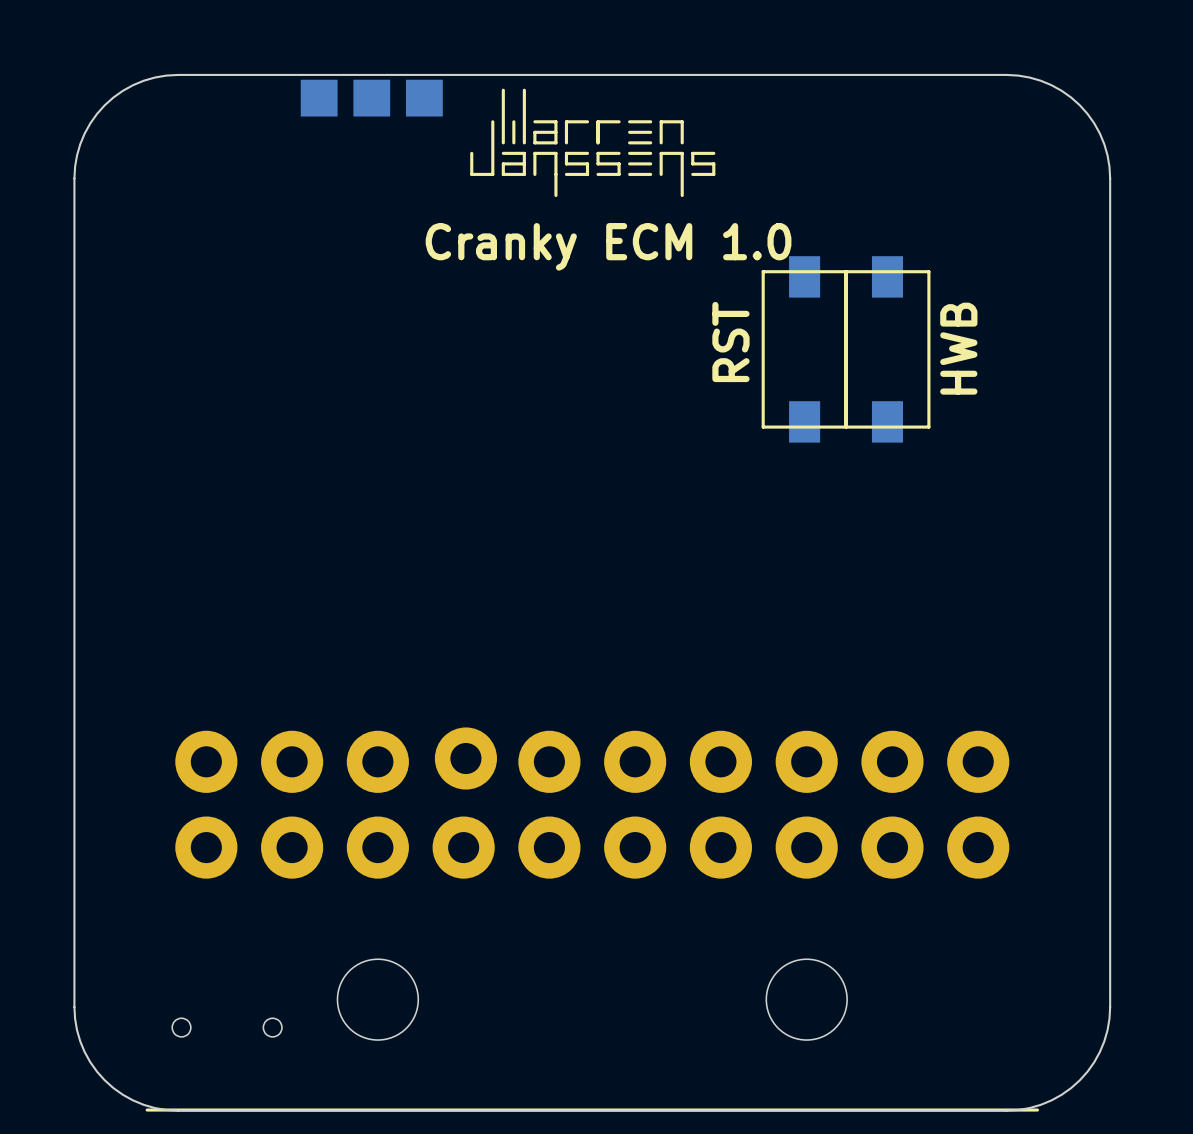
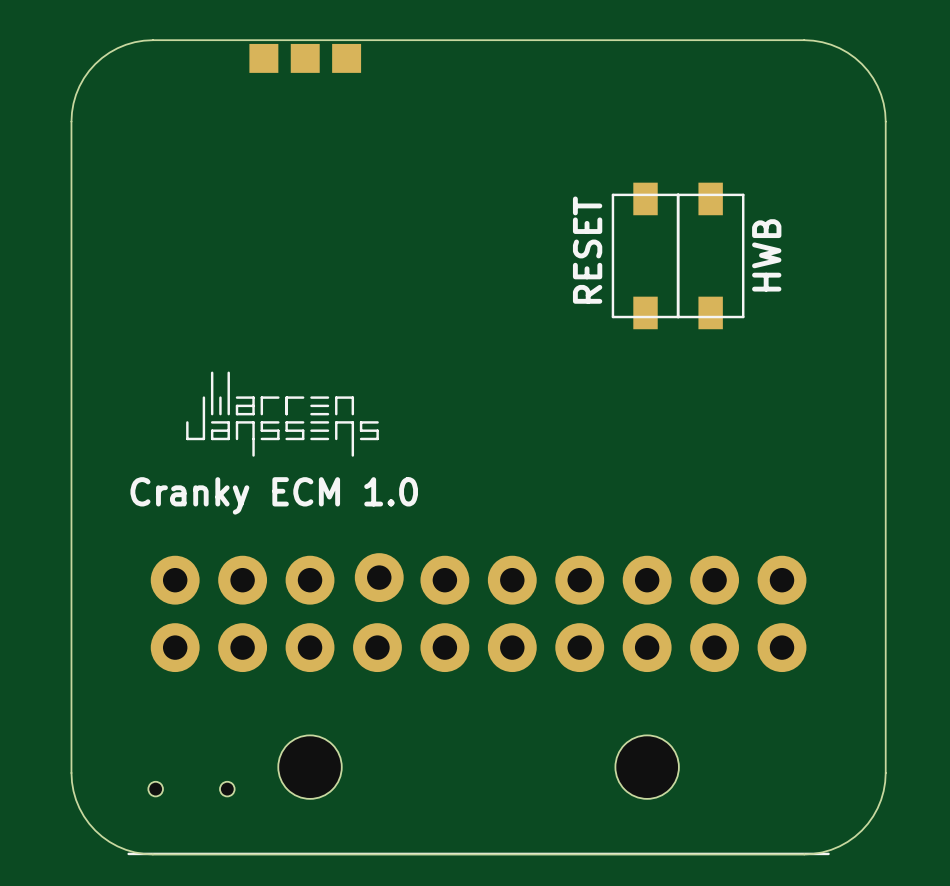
drawing position: (592, 142) -> (282, 414)
text position: Cranky ECM 1.0 (608, 246) -> Cranky ECM 1.0 (274, 495)
text: RST (730, 342) -> RESET (587, 250)

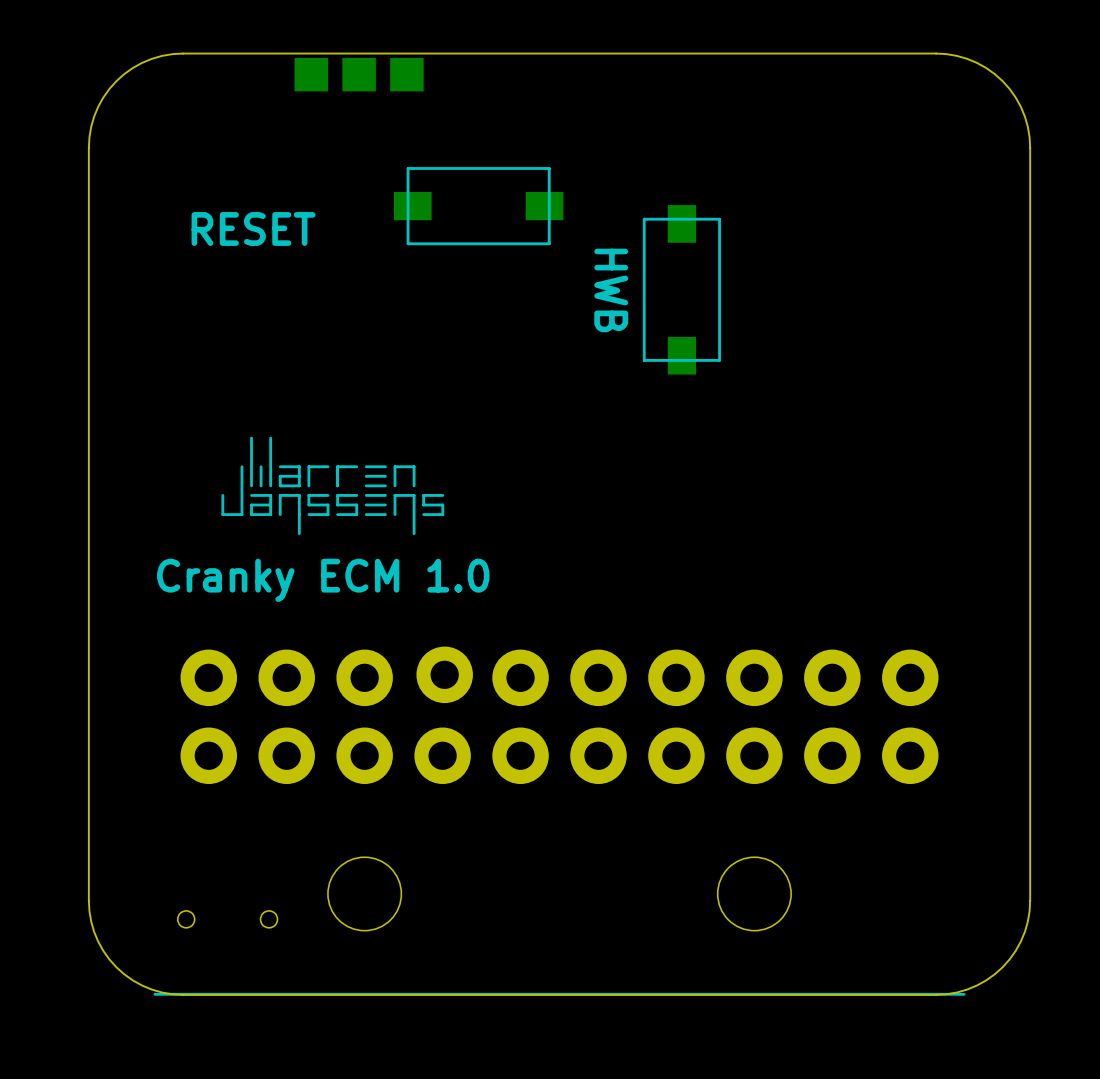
part: none -> (478, 206)
text rotation: 0° (587, 250) -> 90° clockwise (253, 228)
text position: RESET (587, 250) -> RESET (253, 228)
part position: (645, 255) -> (681, 289)
part: (710, 255) -> none
text rotation: 0° (766, 255) -> 180° (611, 290)
text position: HWB (766, 255) -> HWB (611, 290)

